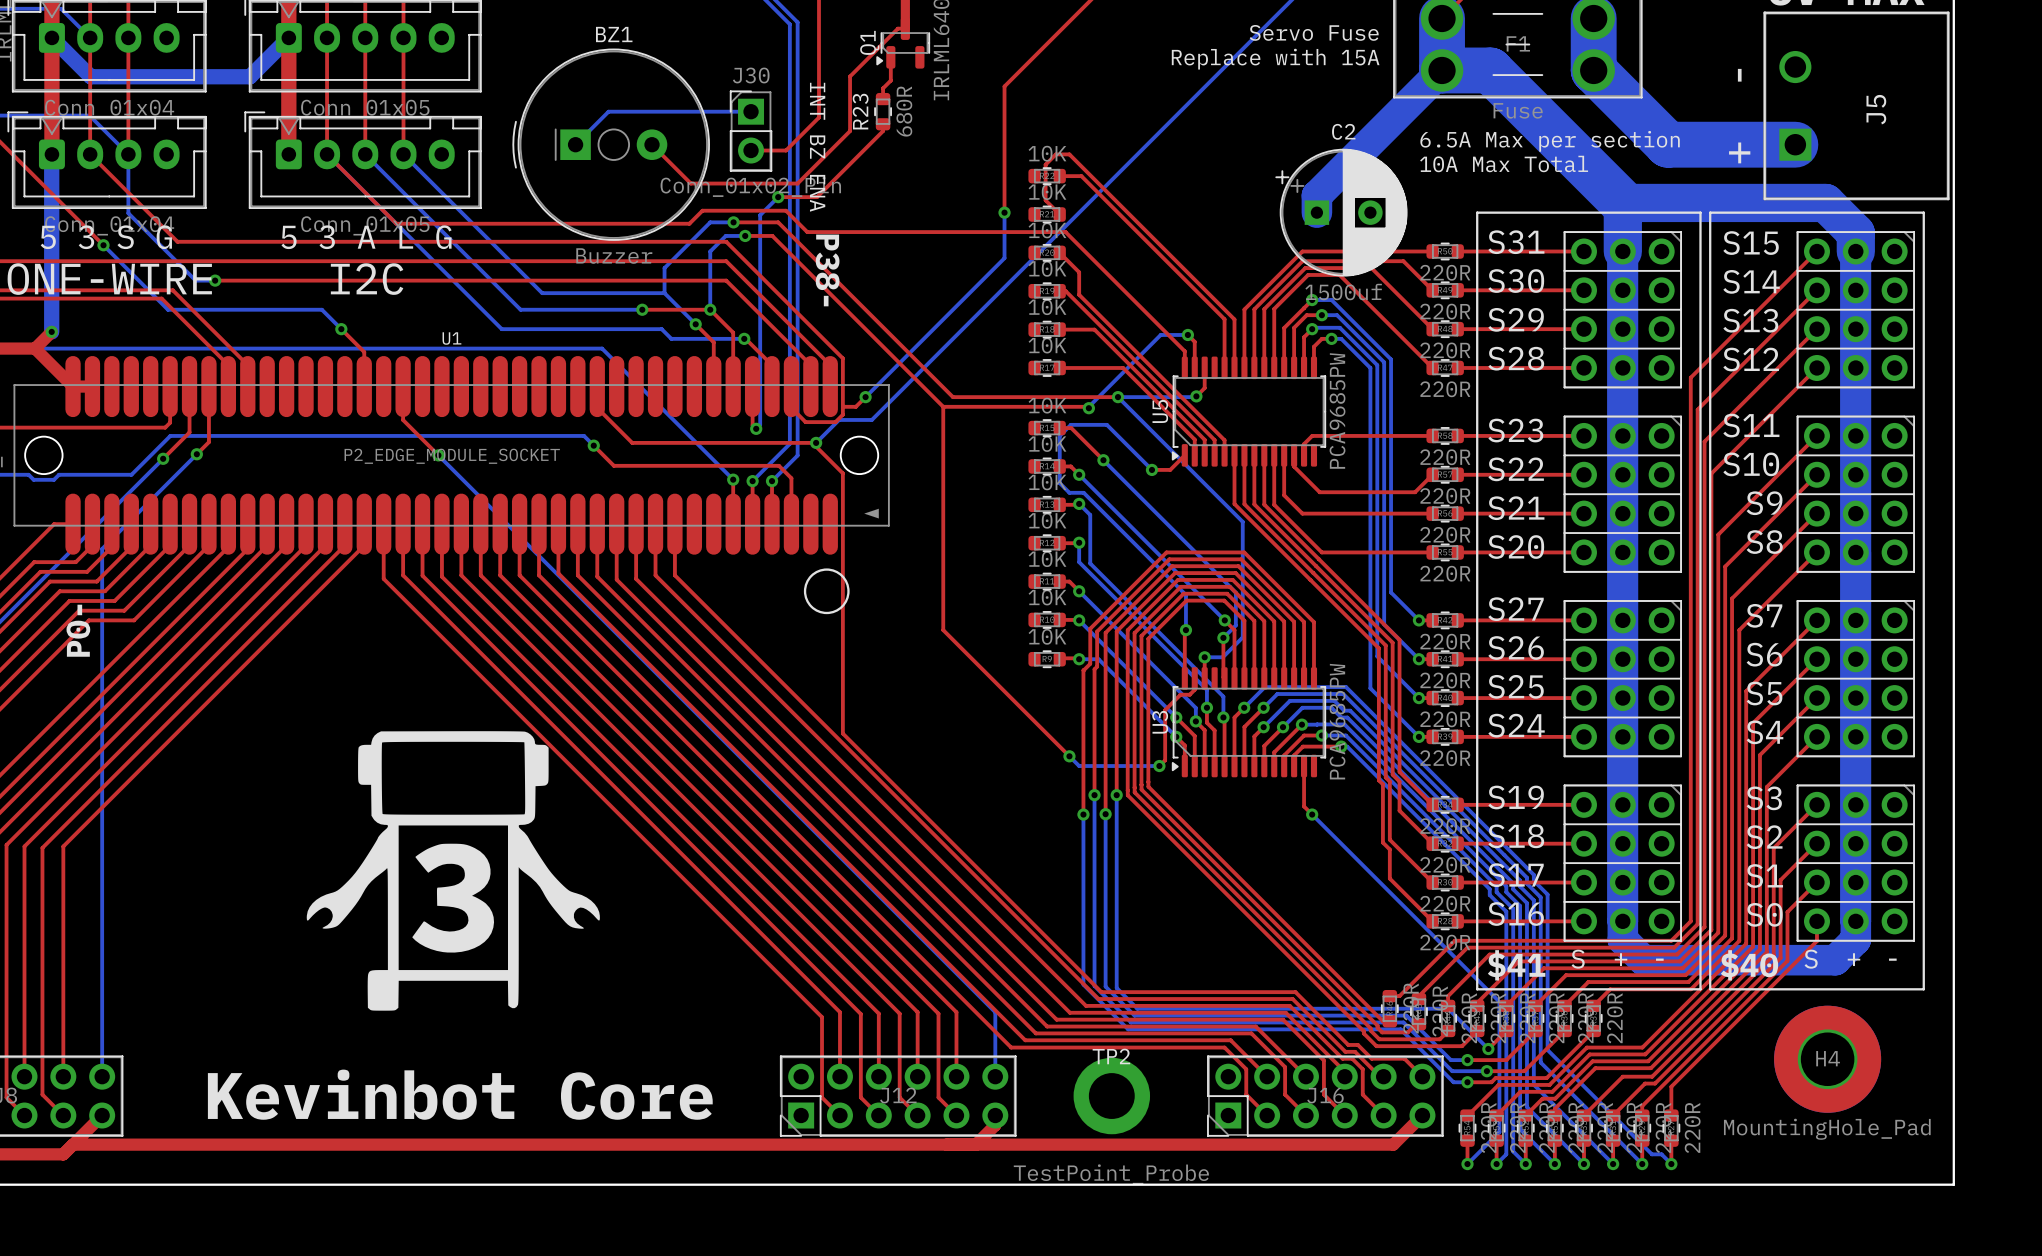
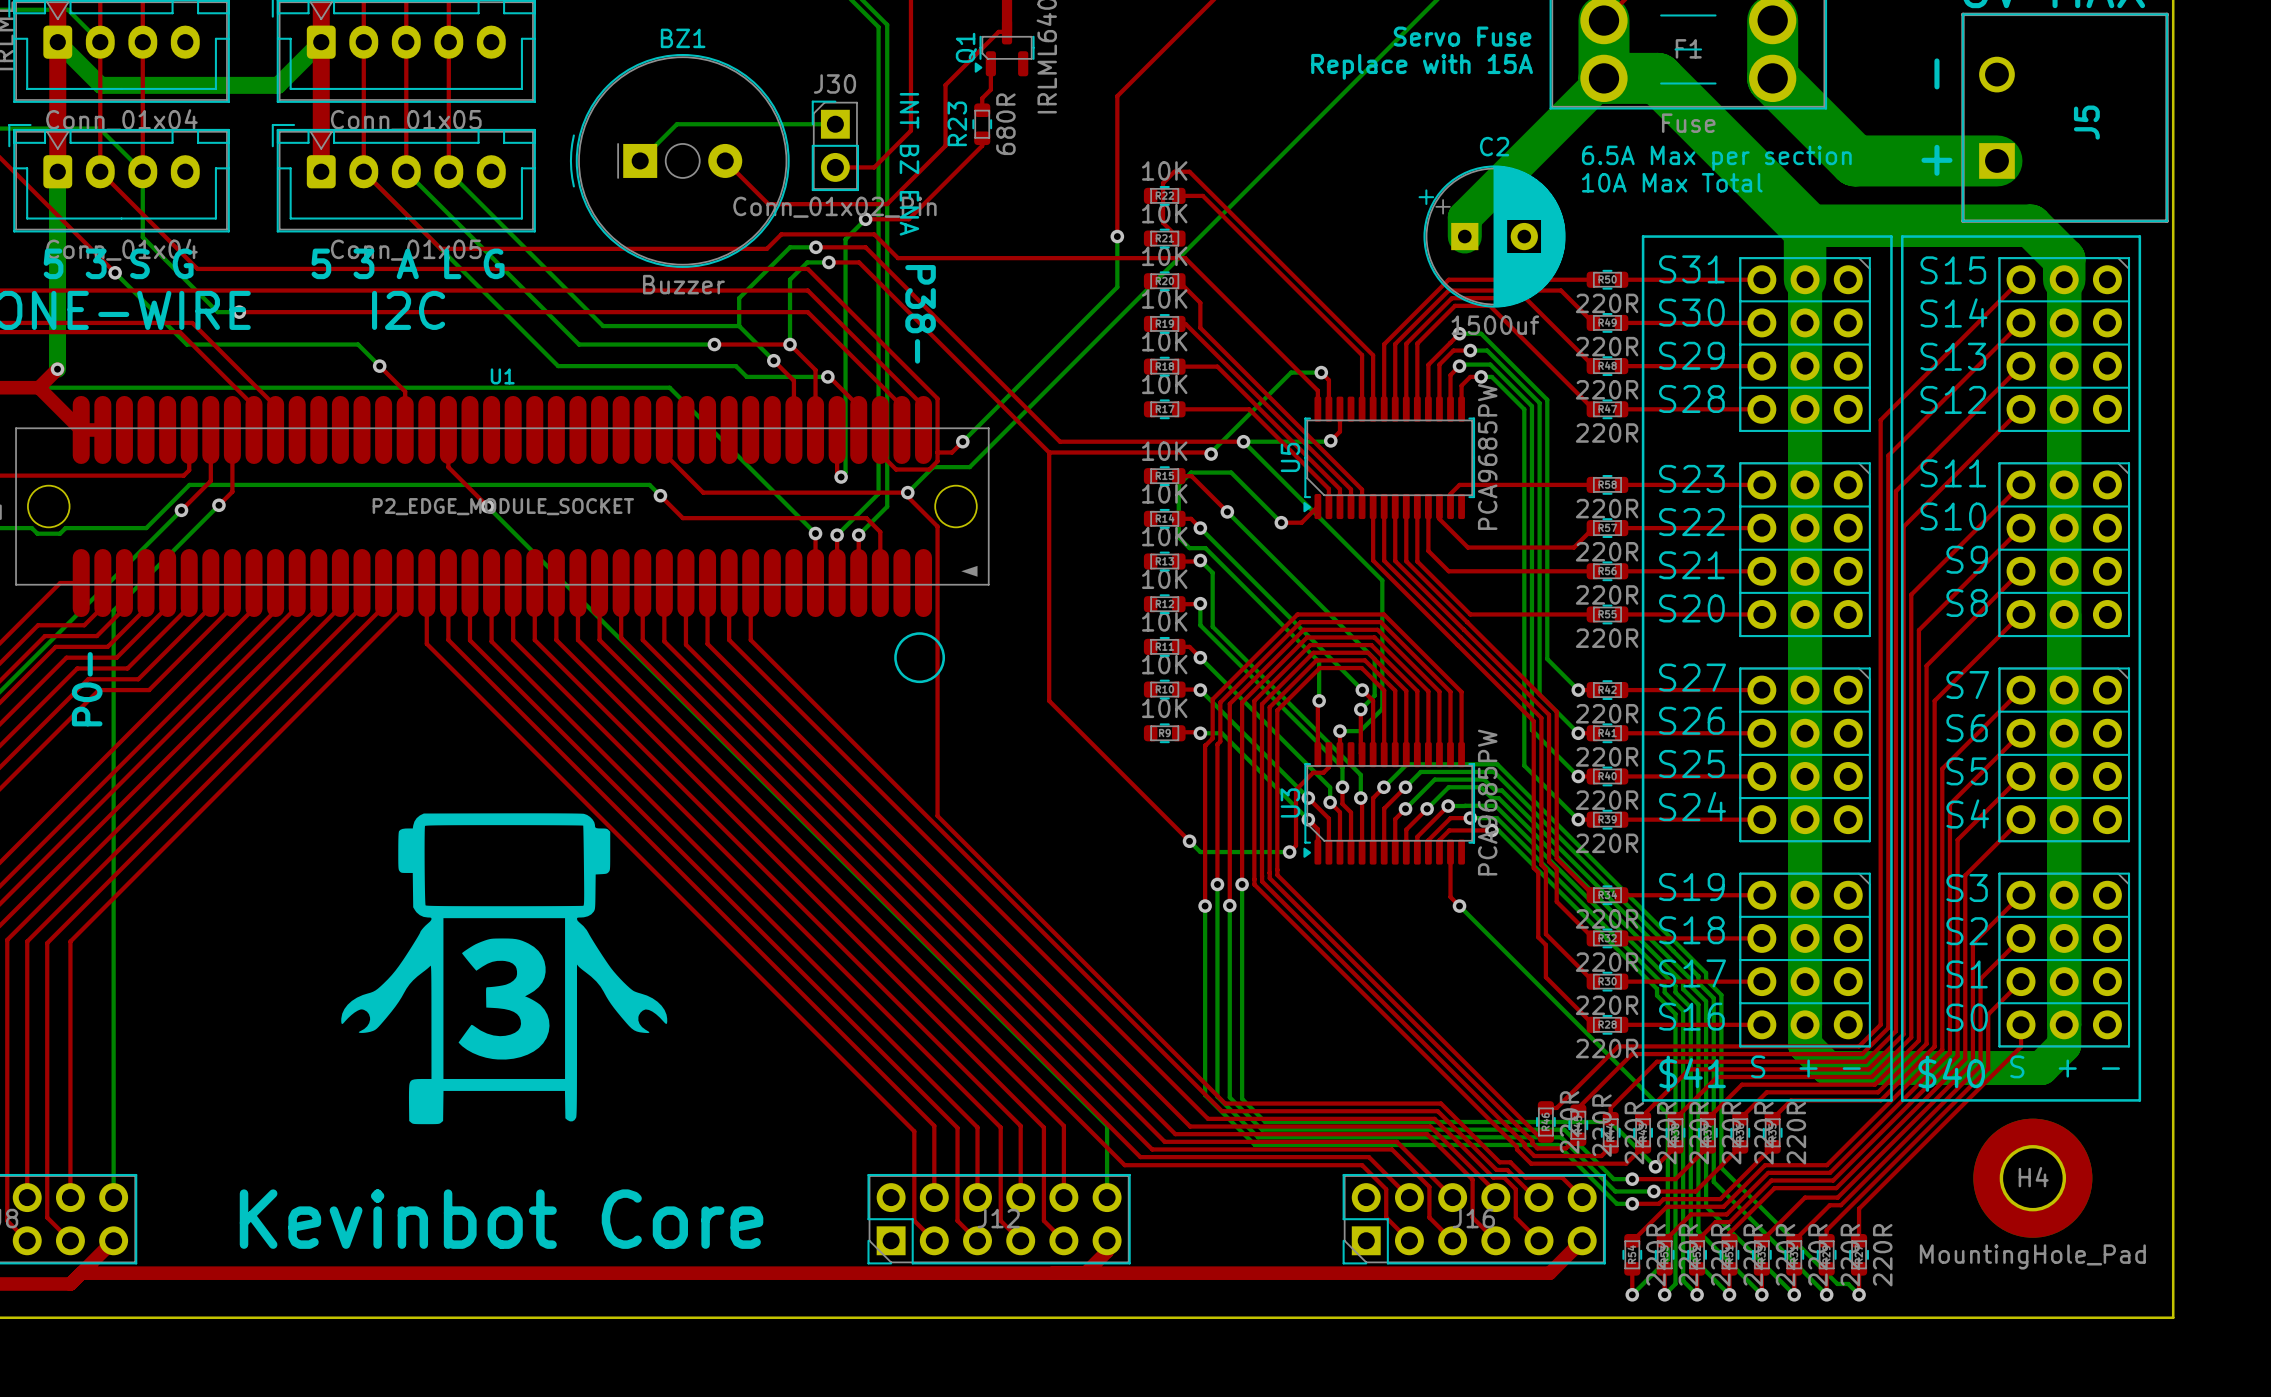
TP2: TestPoint_Probe (1111, 1096) -> none

